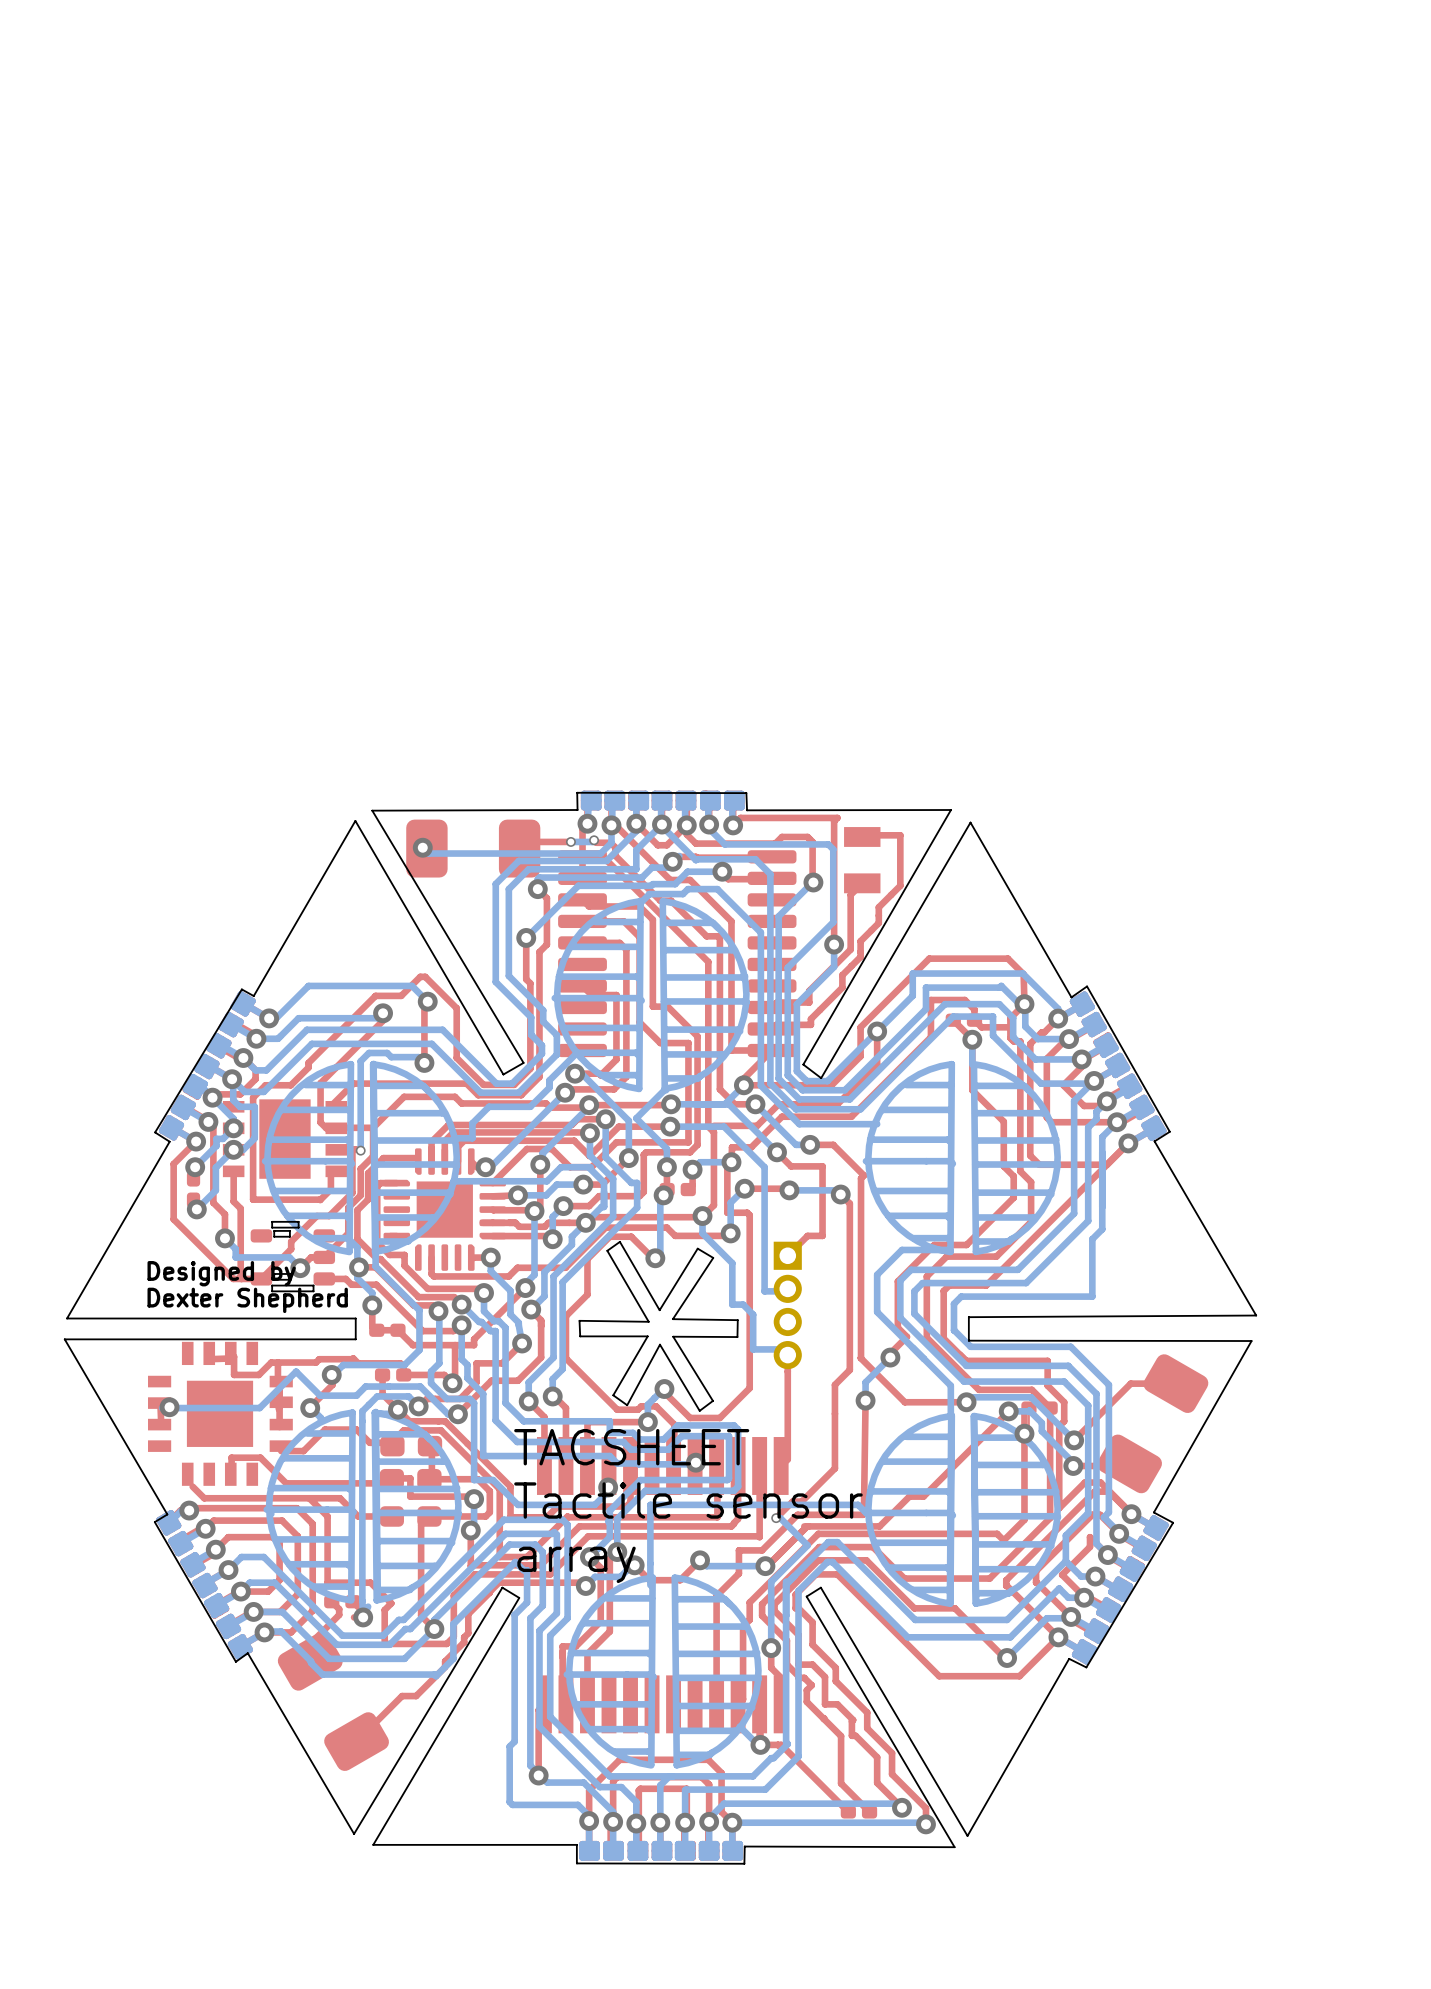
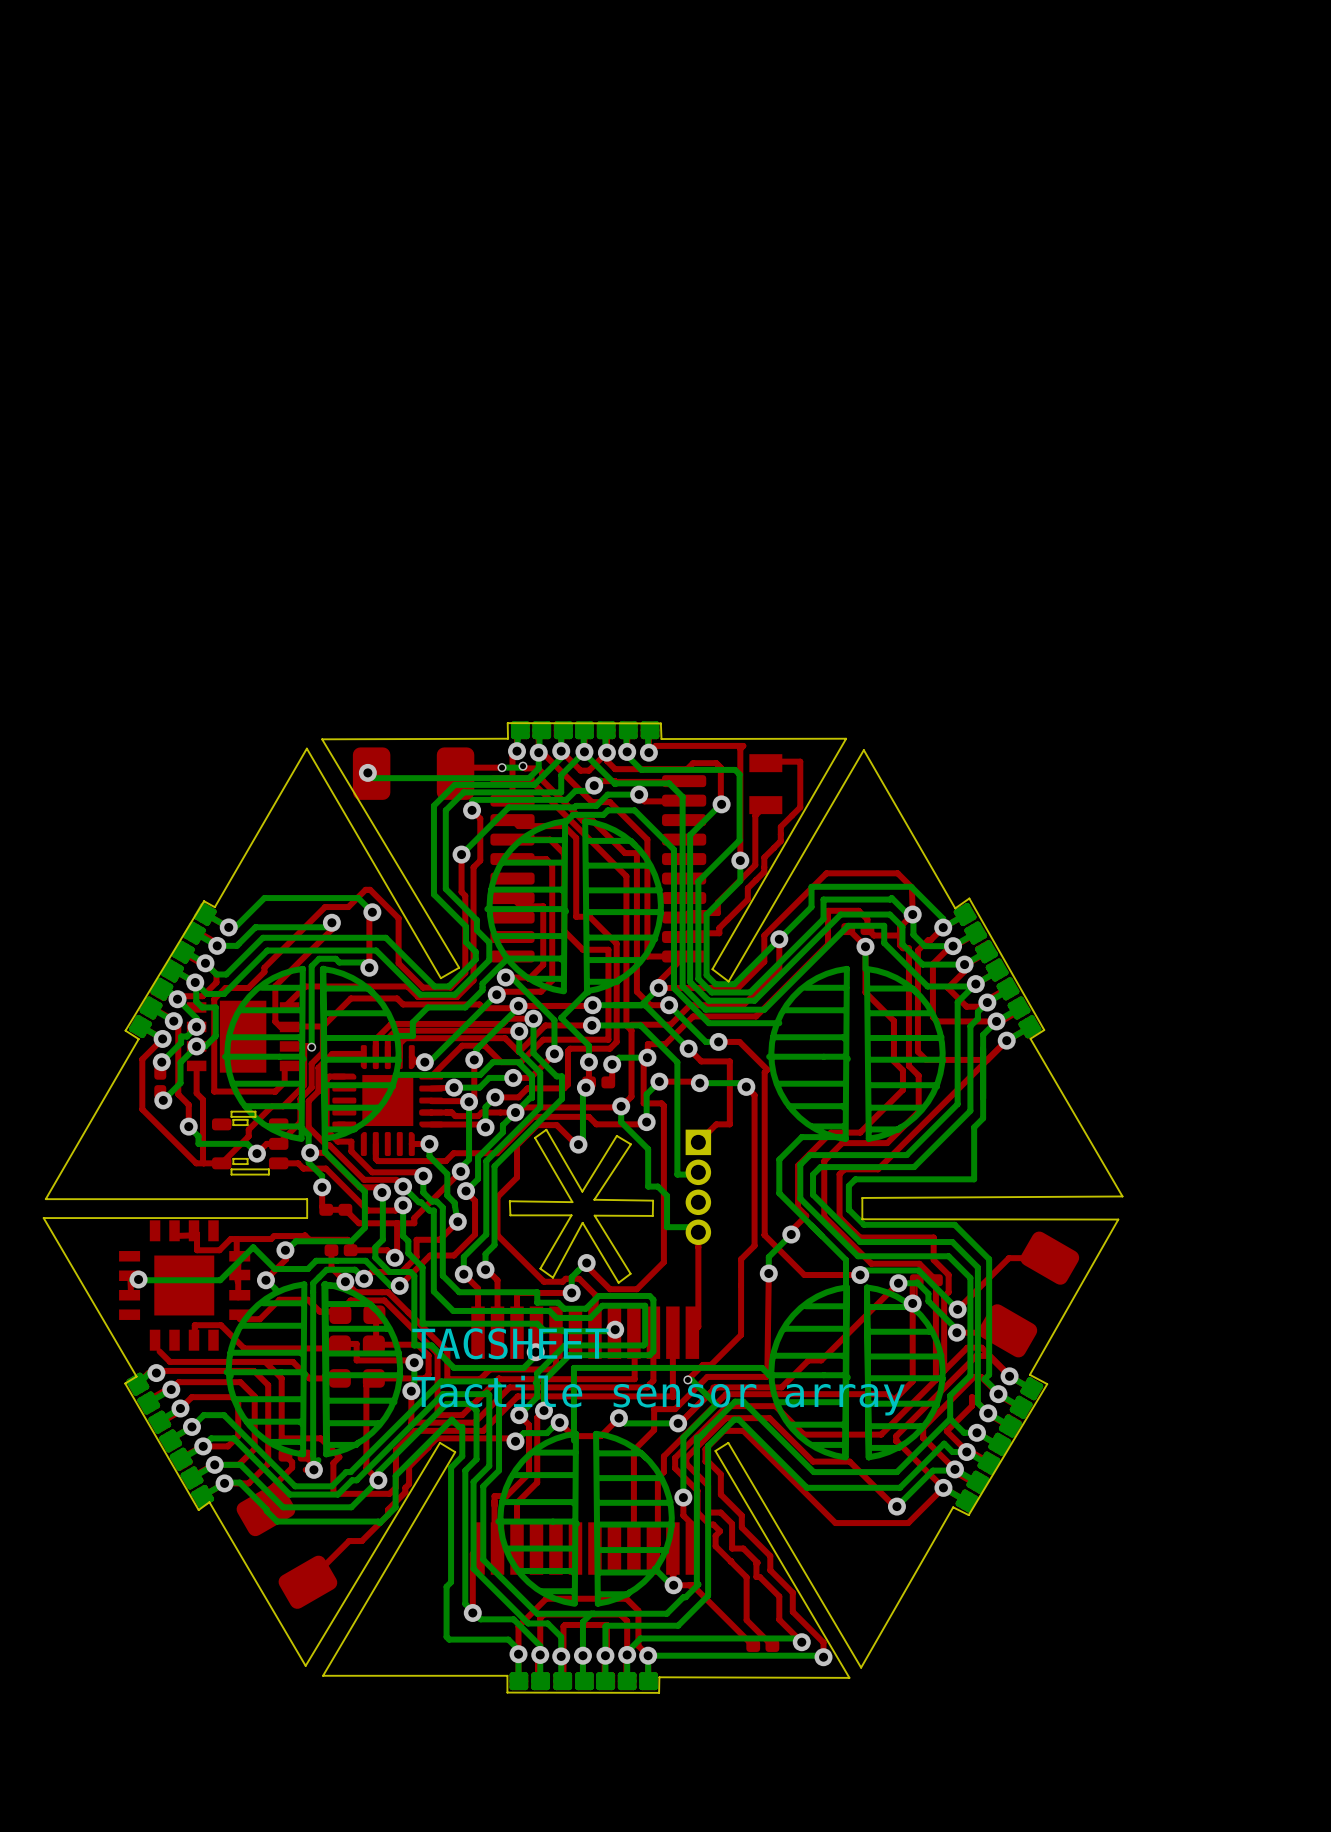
text: Designed by (221, 1273) -> none
text: Dexter Shepherd (247, 1300) -> none
text position: TACSHEET (631, 1447) -> TACSHEET (510, 1343)
text: Tactile sensor (688, 1500) -> Tactile sensor array (658, 1395)
text: array (576, 1564) -> none

